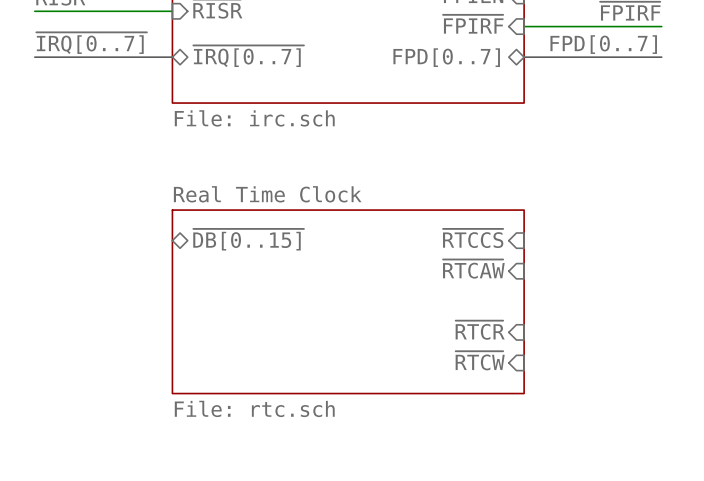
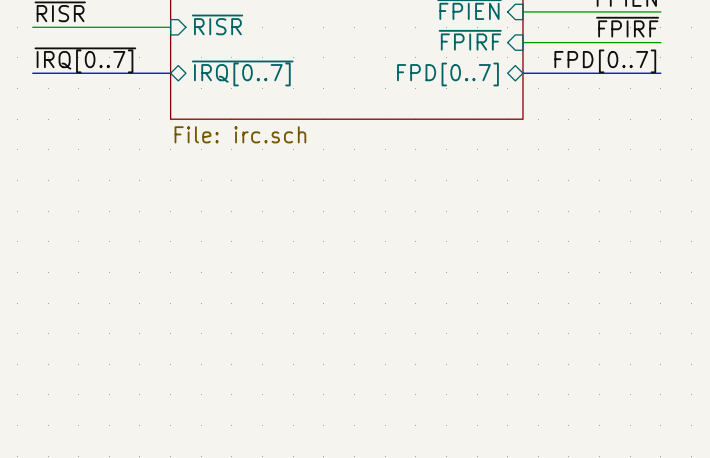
sheet pin: ~{RTCCS} (473, 238) -> none
sheet pin: ~{DB[0..15]} (248, 239) -> none
sheet pin: ~{RTCAW} (473, 269) -> none
sheet Real Time Clock: File: rtc.sch (348, 301) -> none
sheet pin: ~{RTCR} (480, 330) -> none
sheet pin: ~{RTCW} (480, 360) -> none

